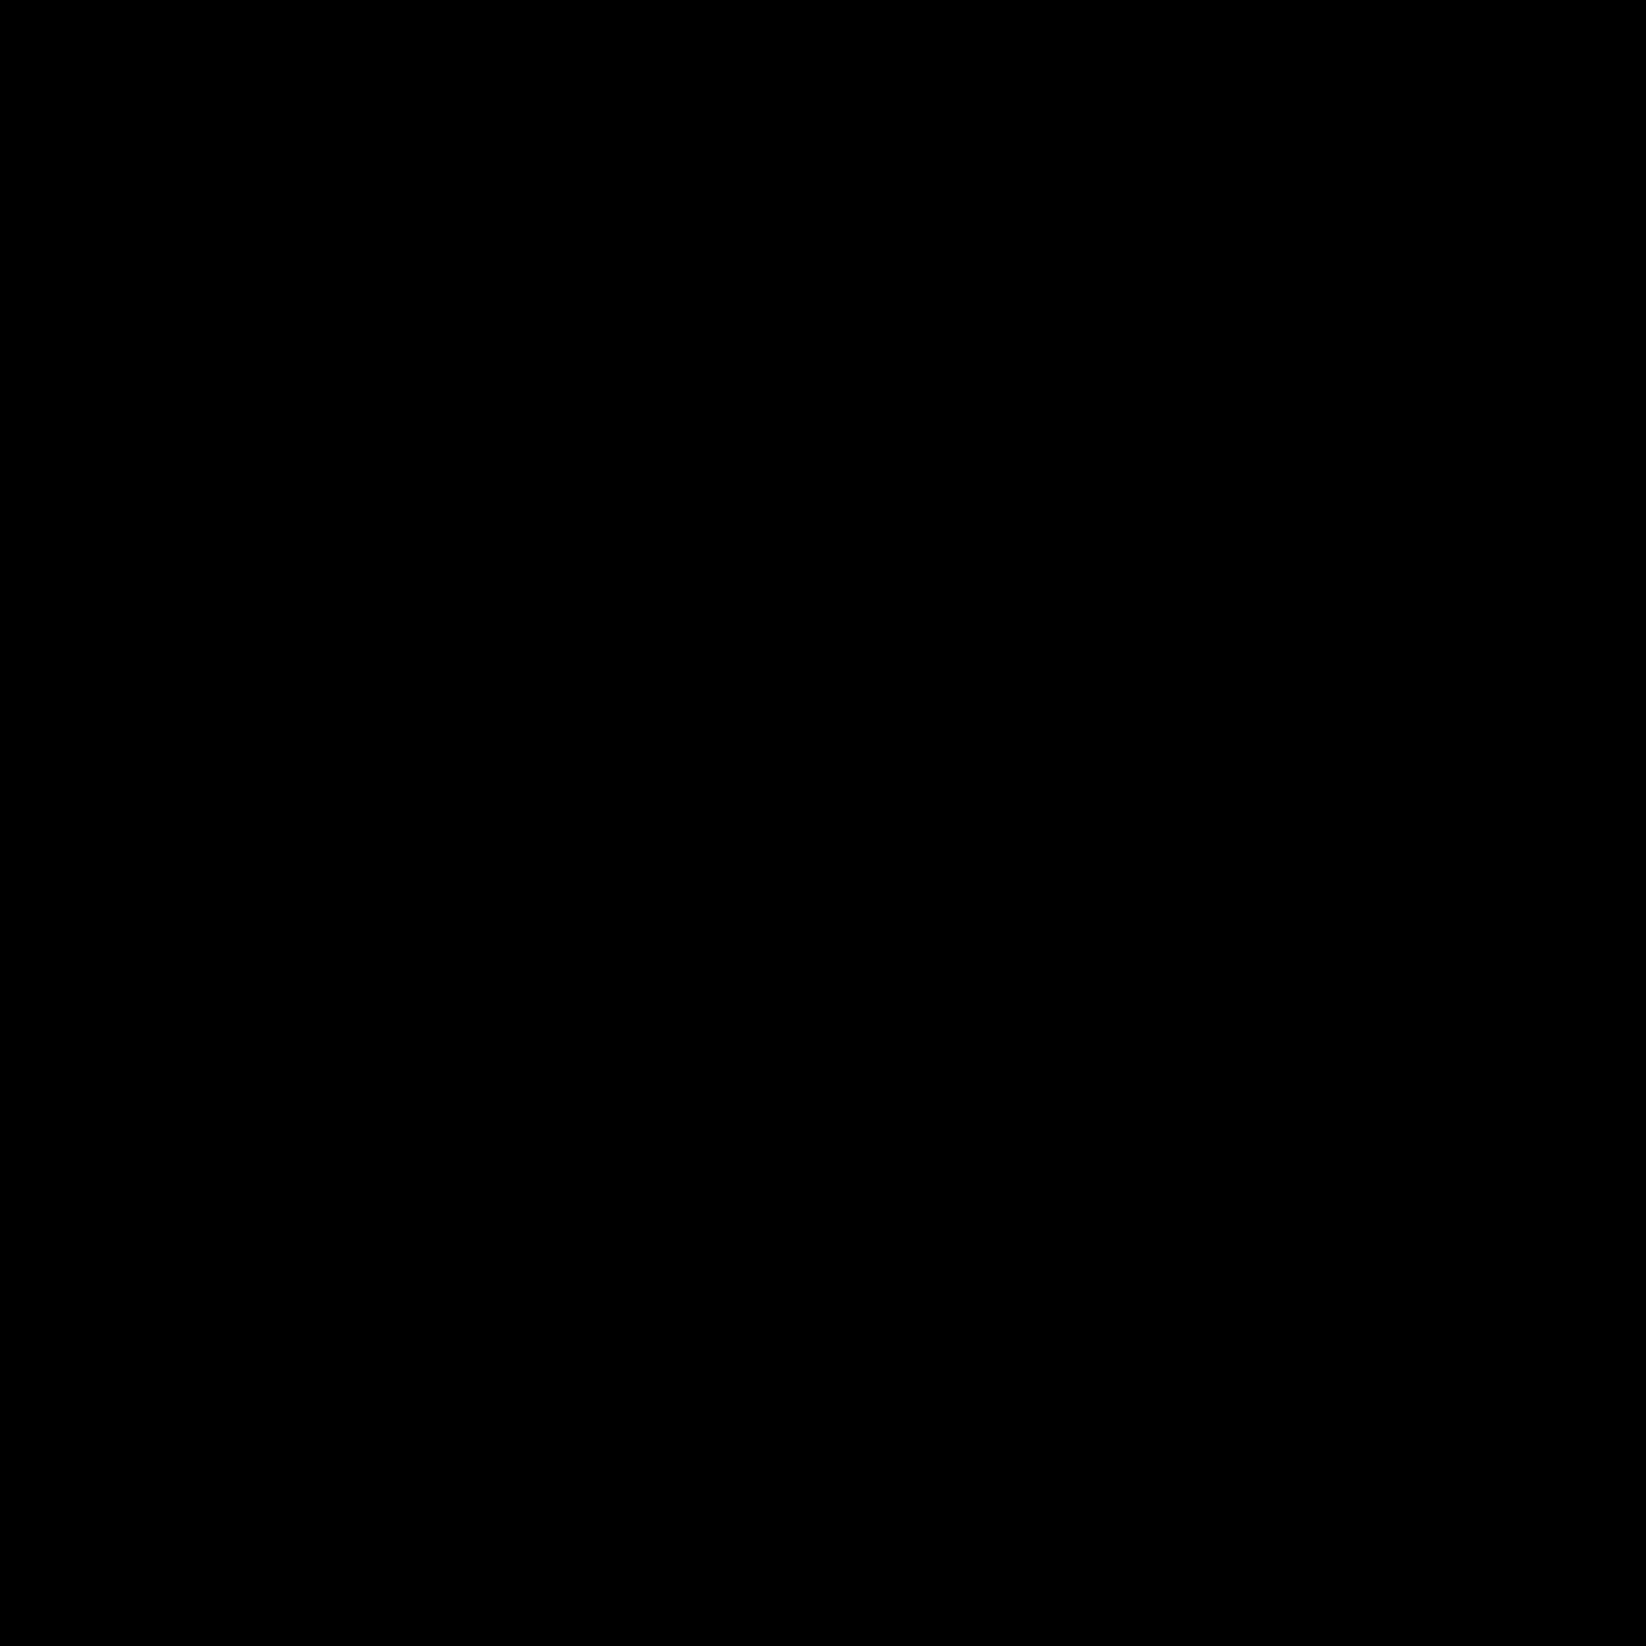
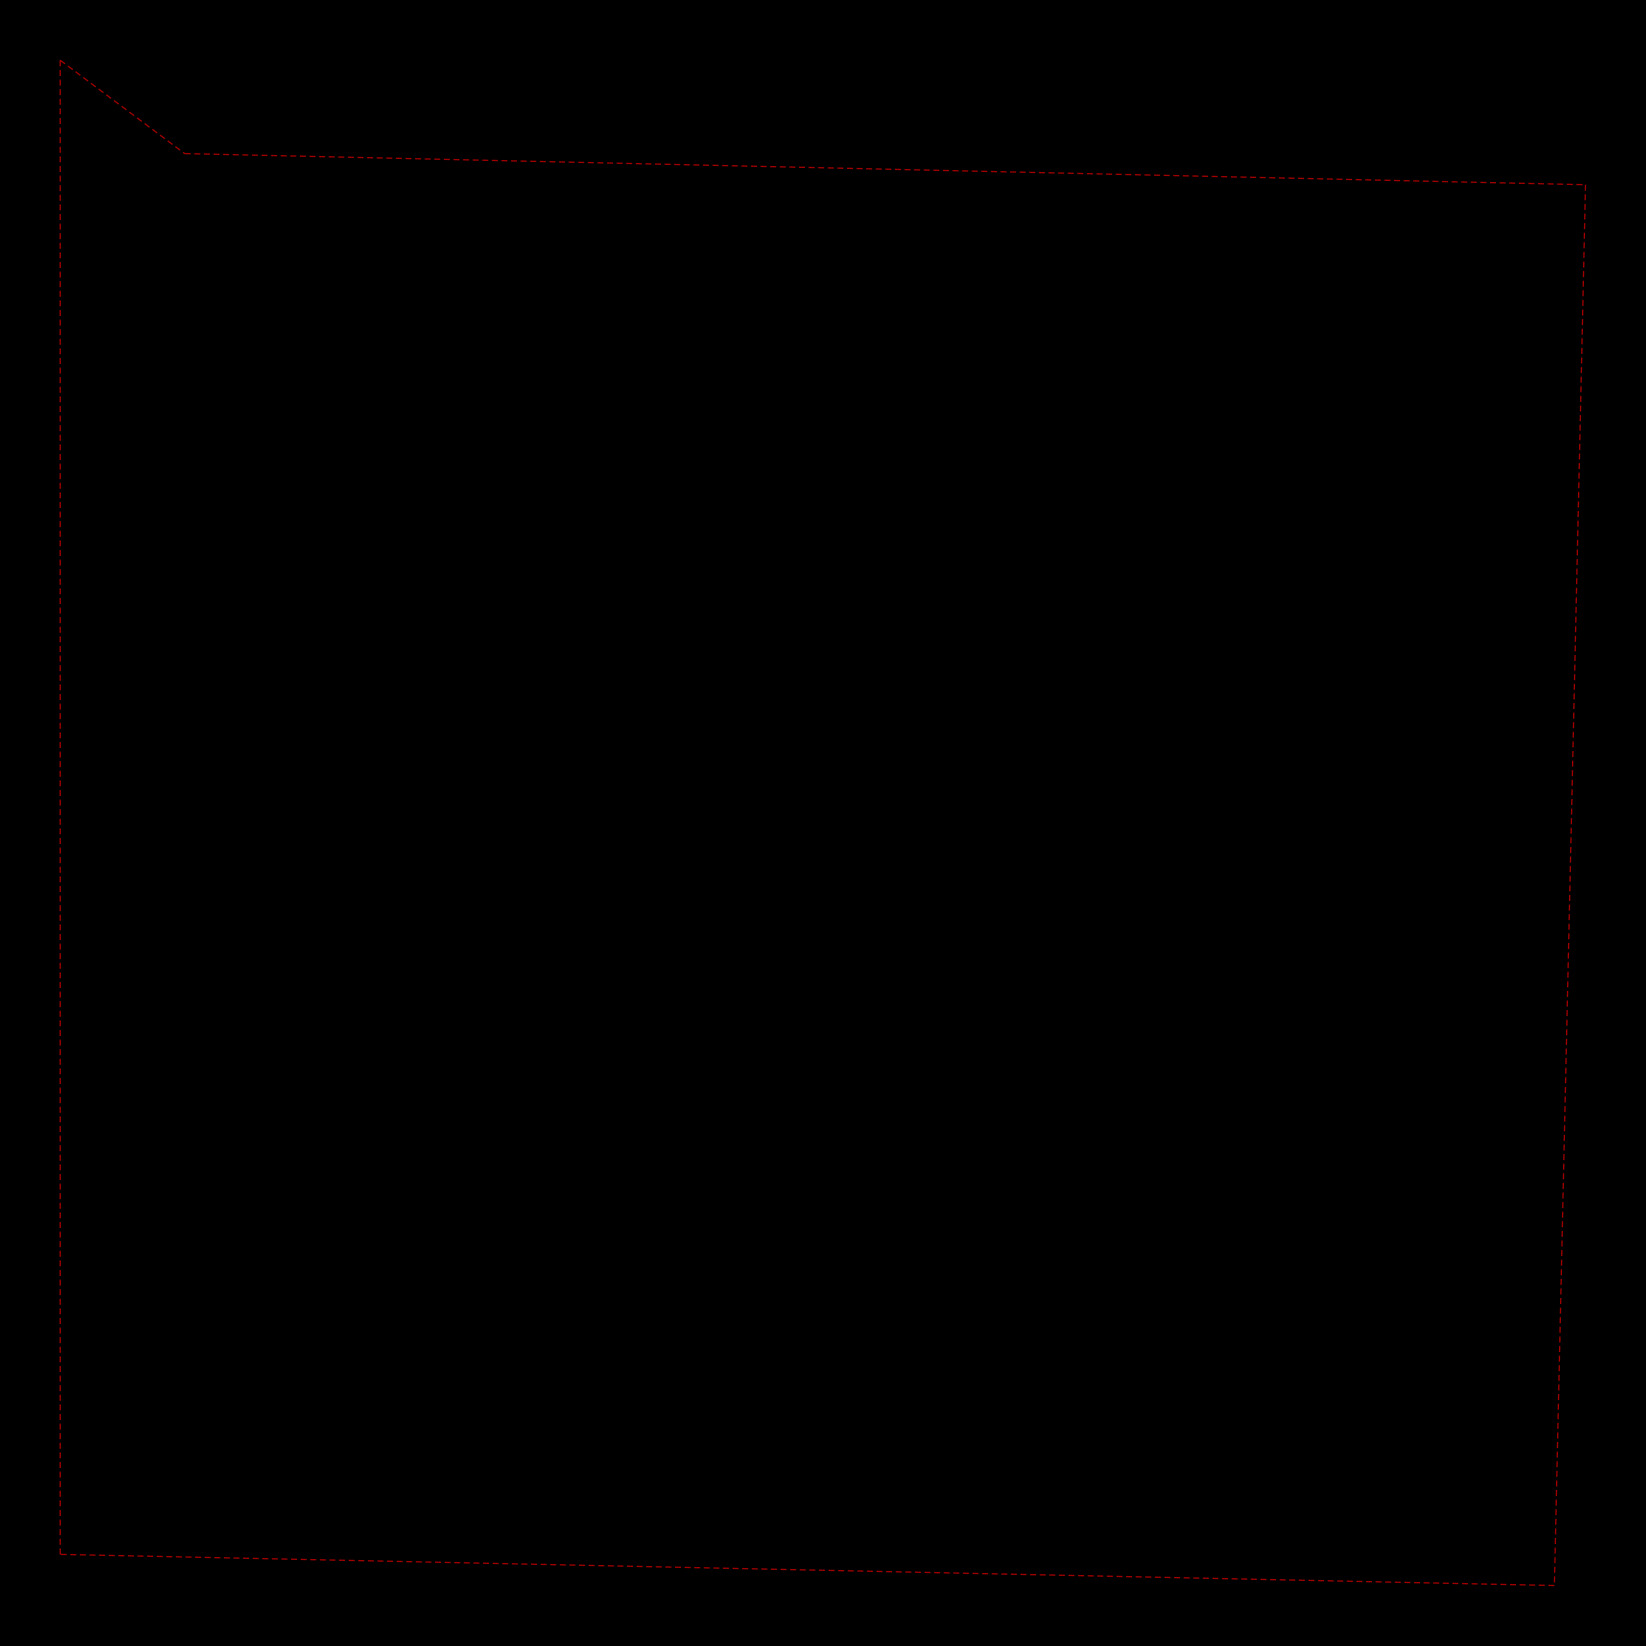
top zone outline: none -> (60, 60) (60, 1554) (1554, 1585) (1585, 184) (184, 153) (60, 60)

